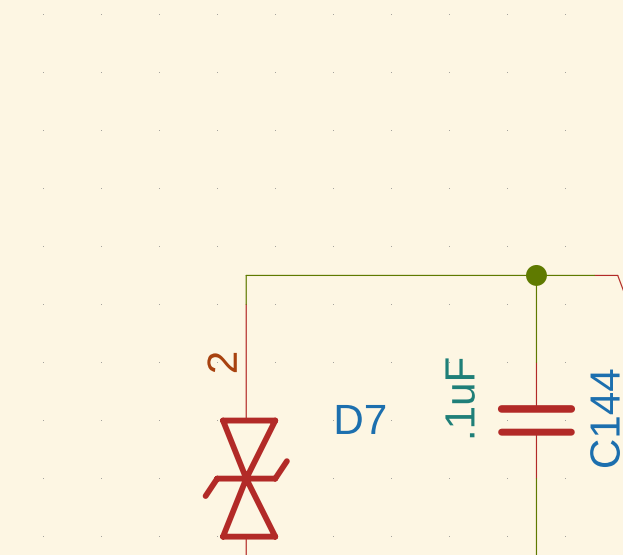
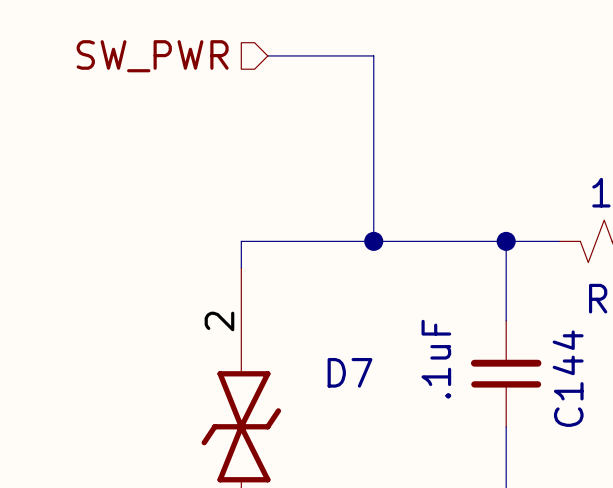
wire: none -> (267, 55) (373, 55) (373, 241)
hierarchical label: none -> SW_PWR (152, 56)
junction: none -> (373, 241)

